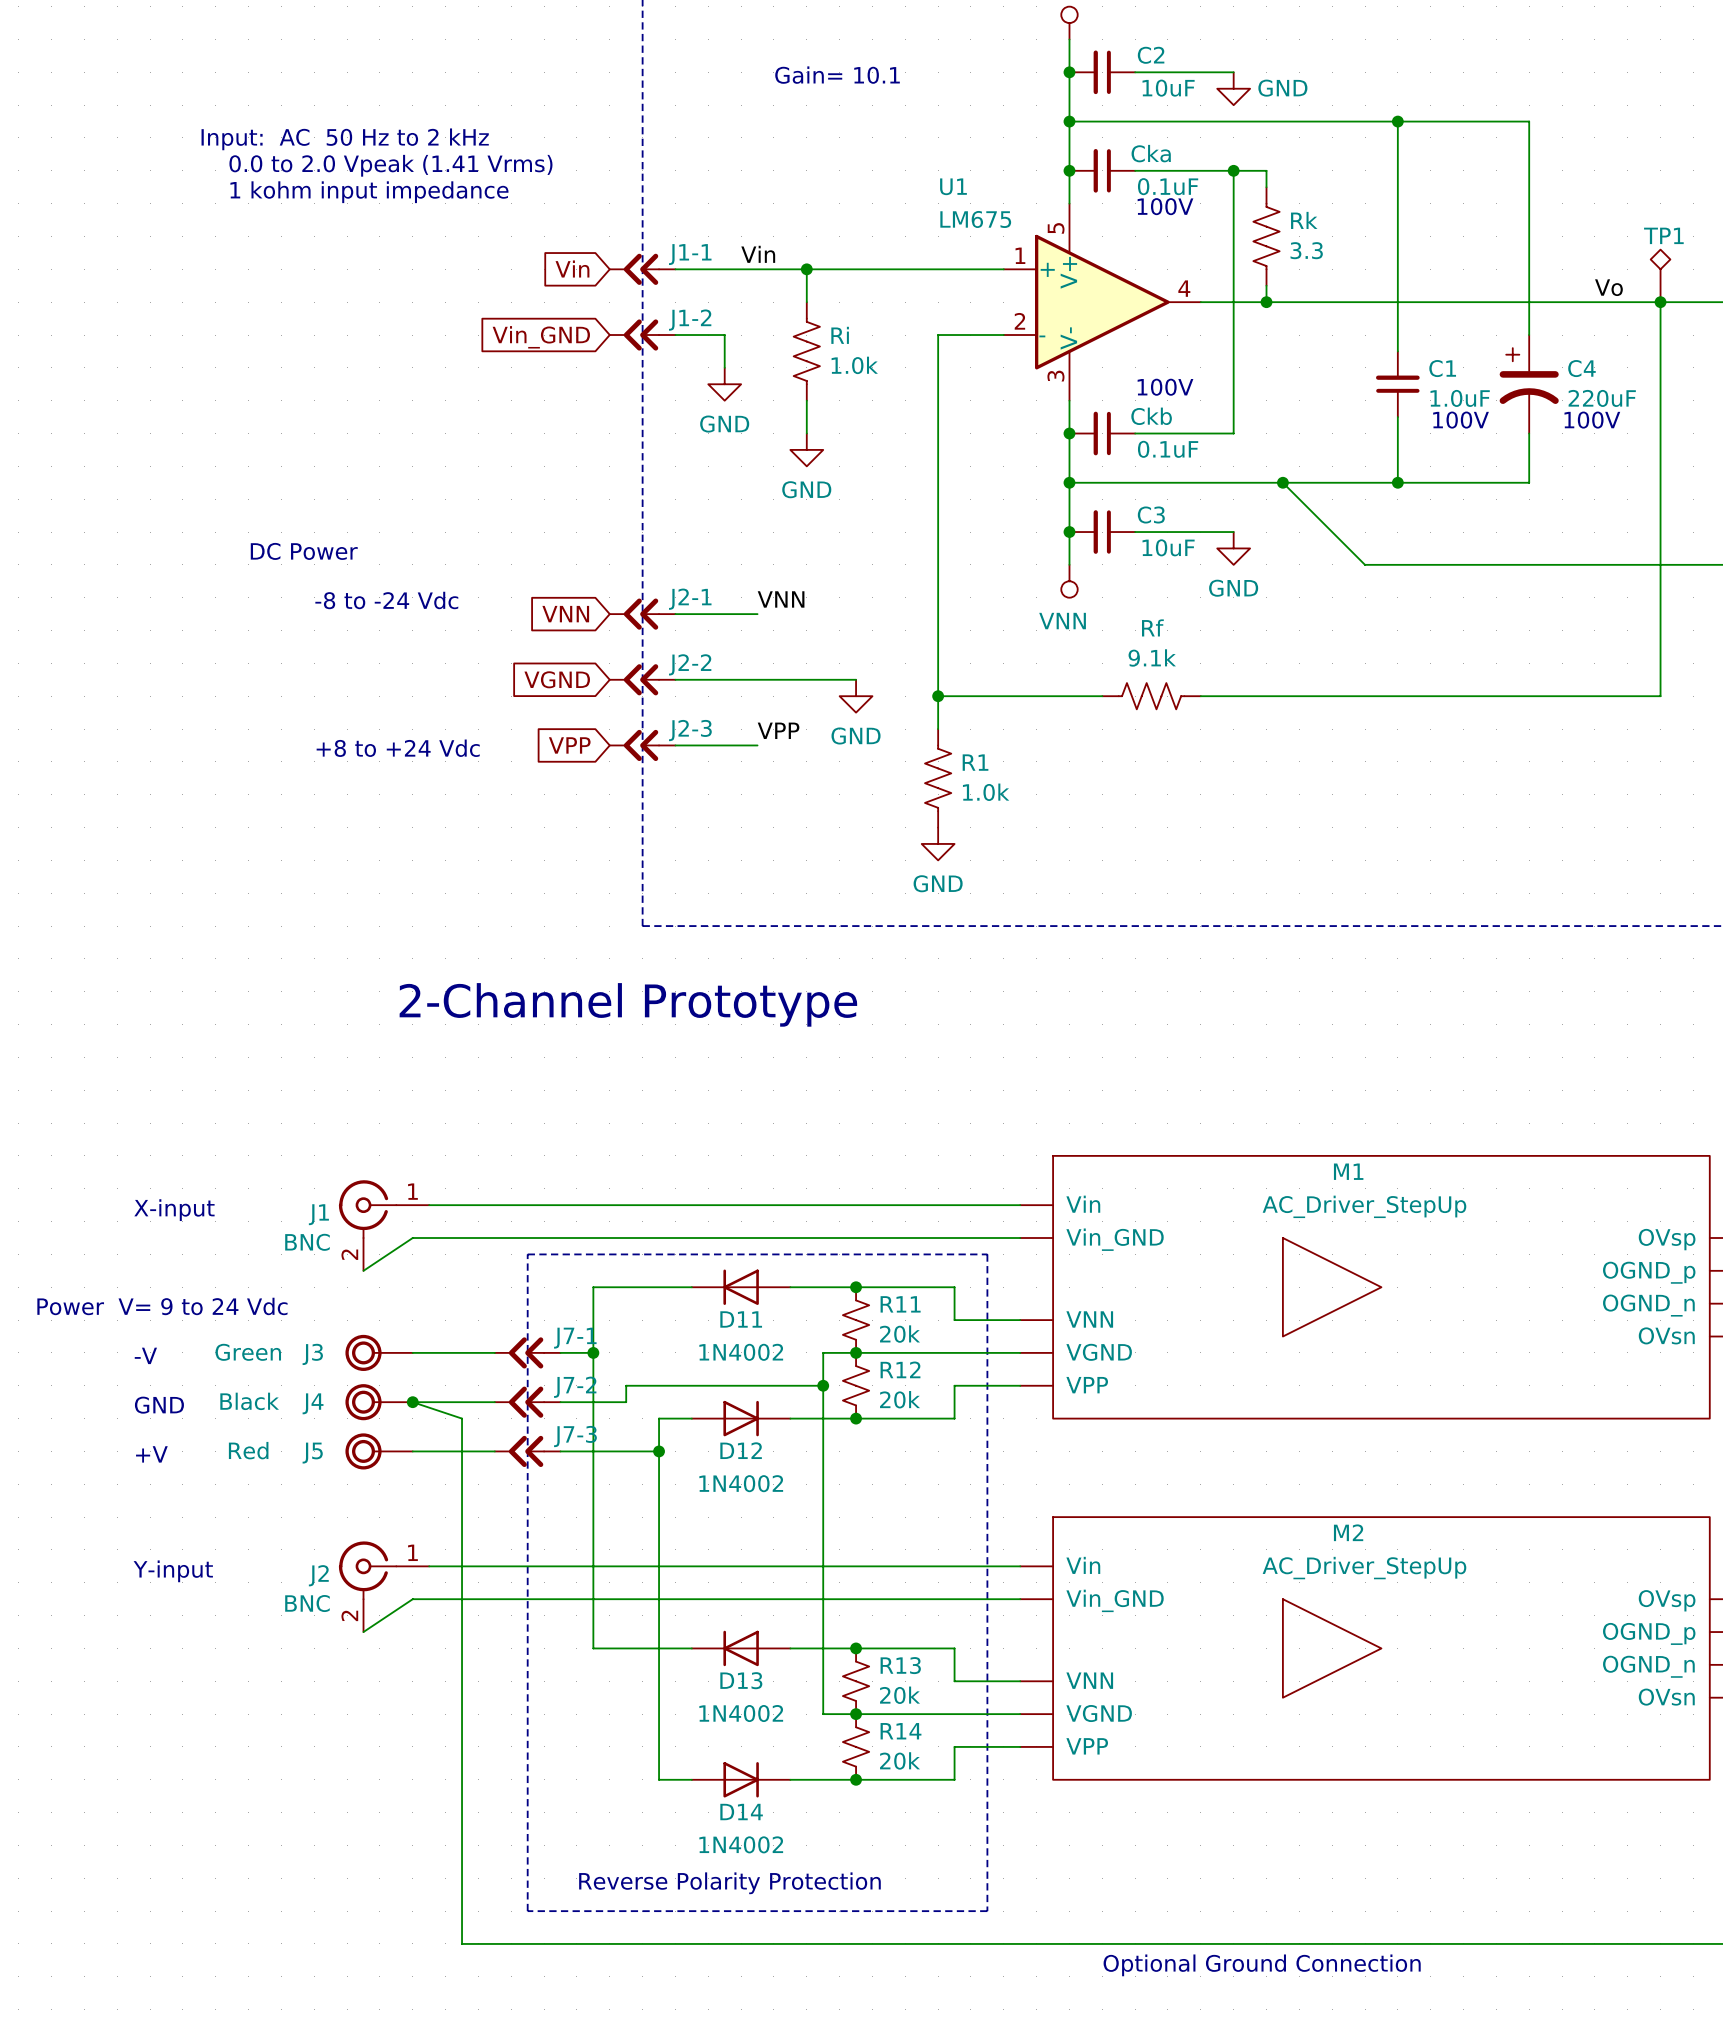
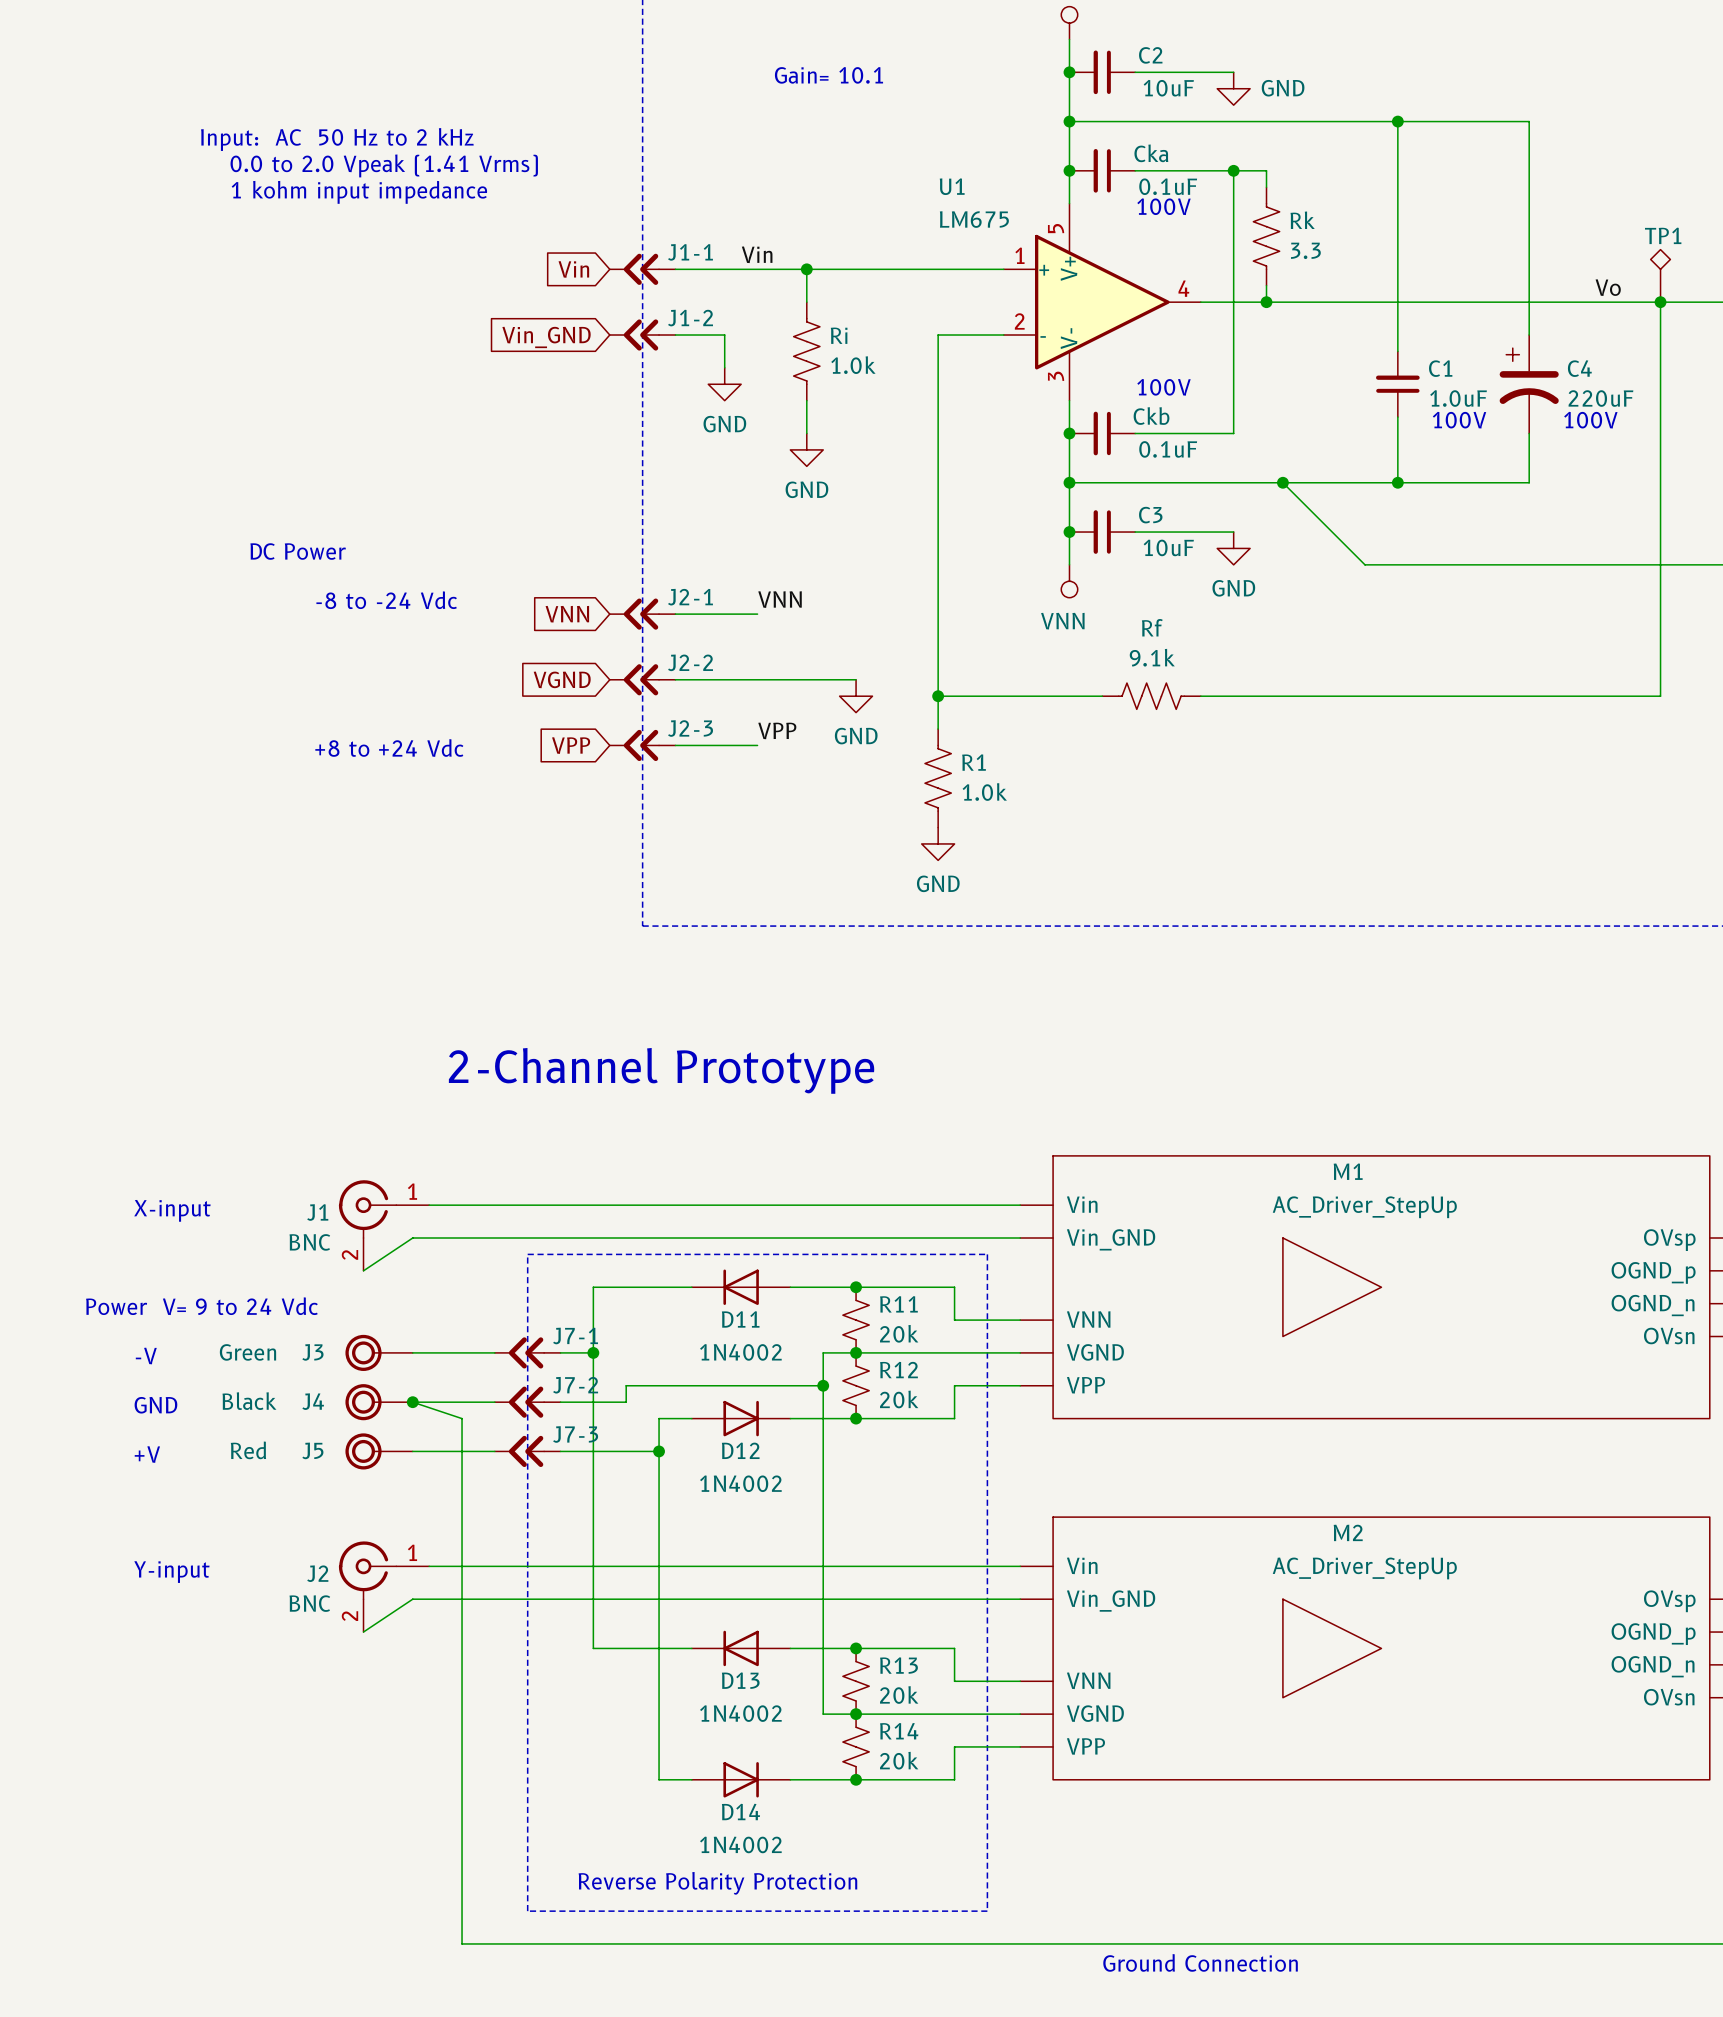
text position: 2-Channel Prototype (628, 1004) -> 2-Channel Prototype (661, 1070)
text position: Power V= 9 to 24 Vdc (162, 1306) -> Power V= 9 to 24 Vdc (201, 1306)
text: Optional Ground Connection (1262, 1965) -> Ground Connection (1200, 1962)

